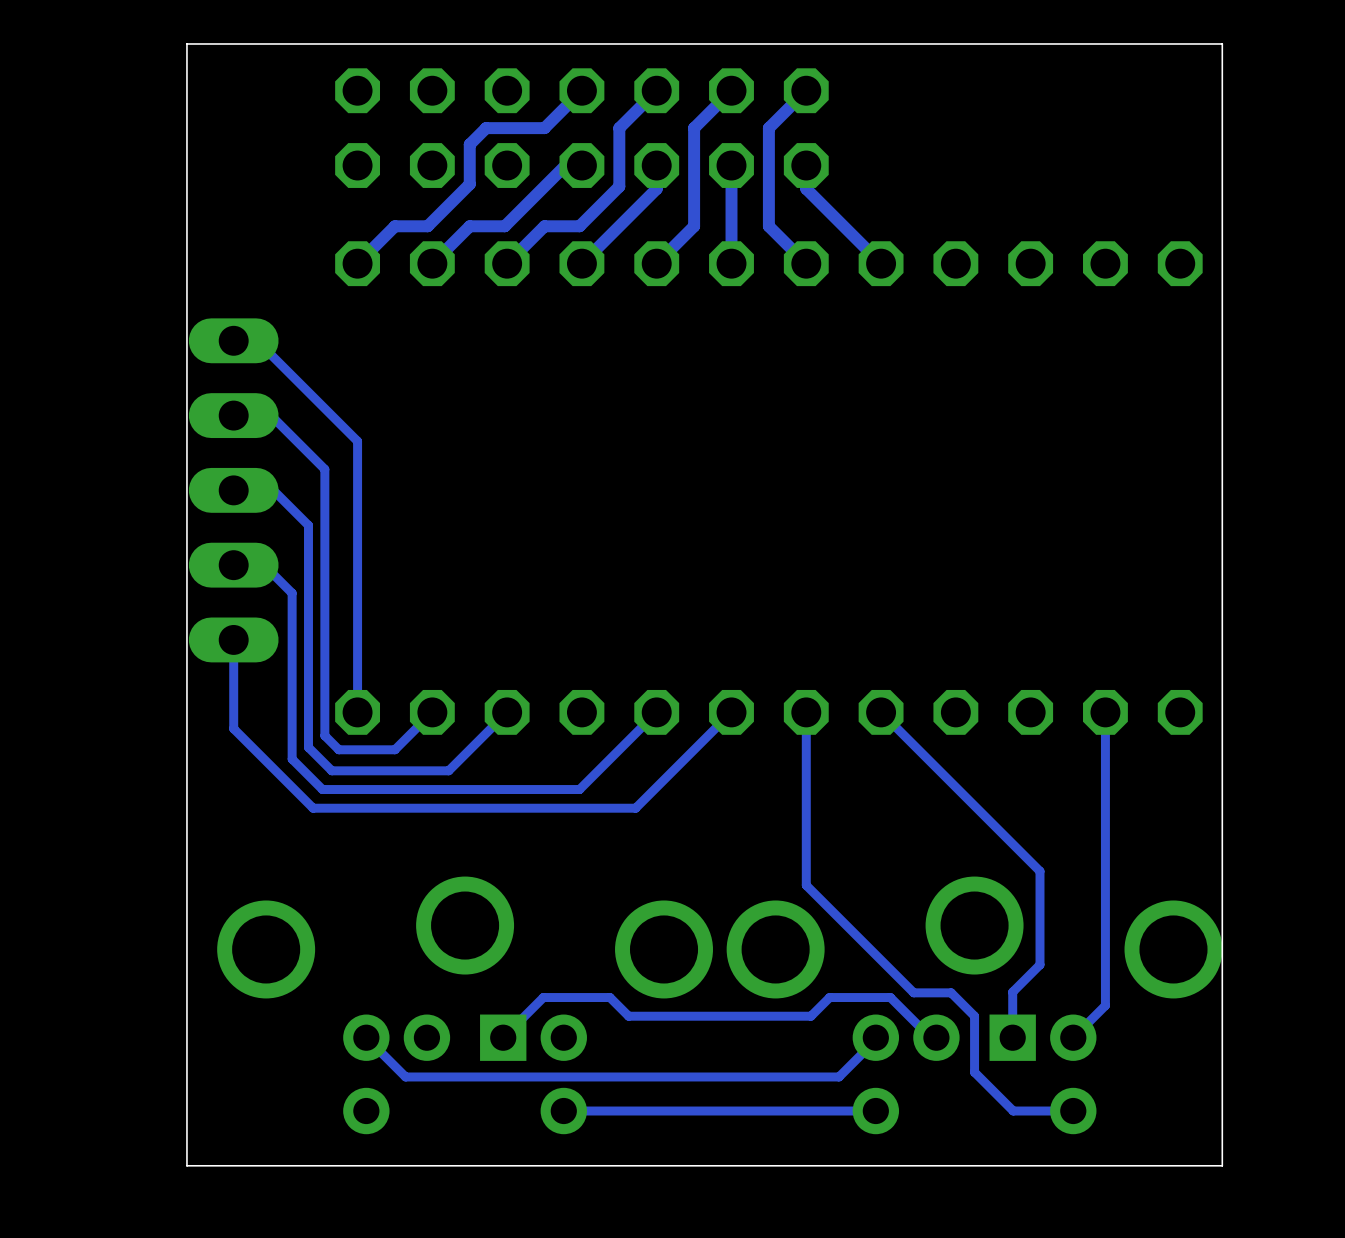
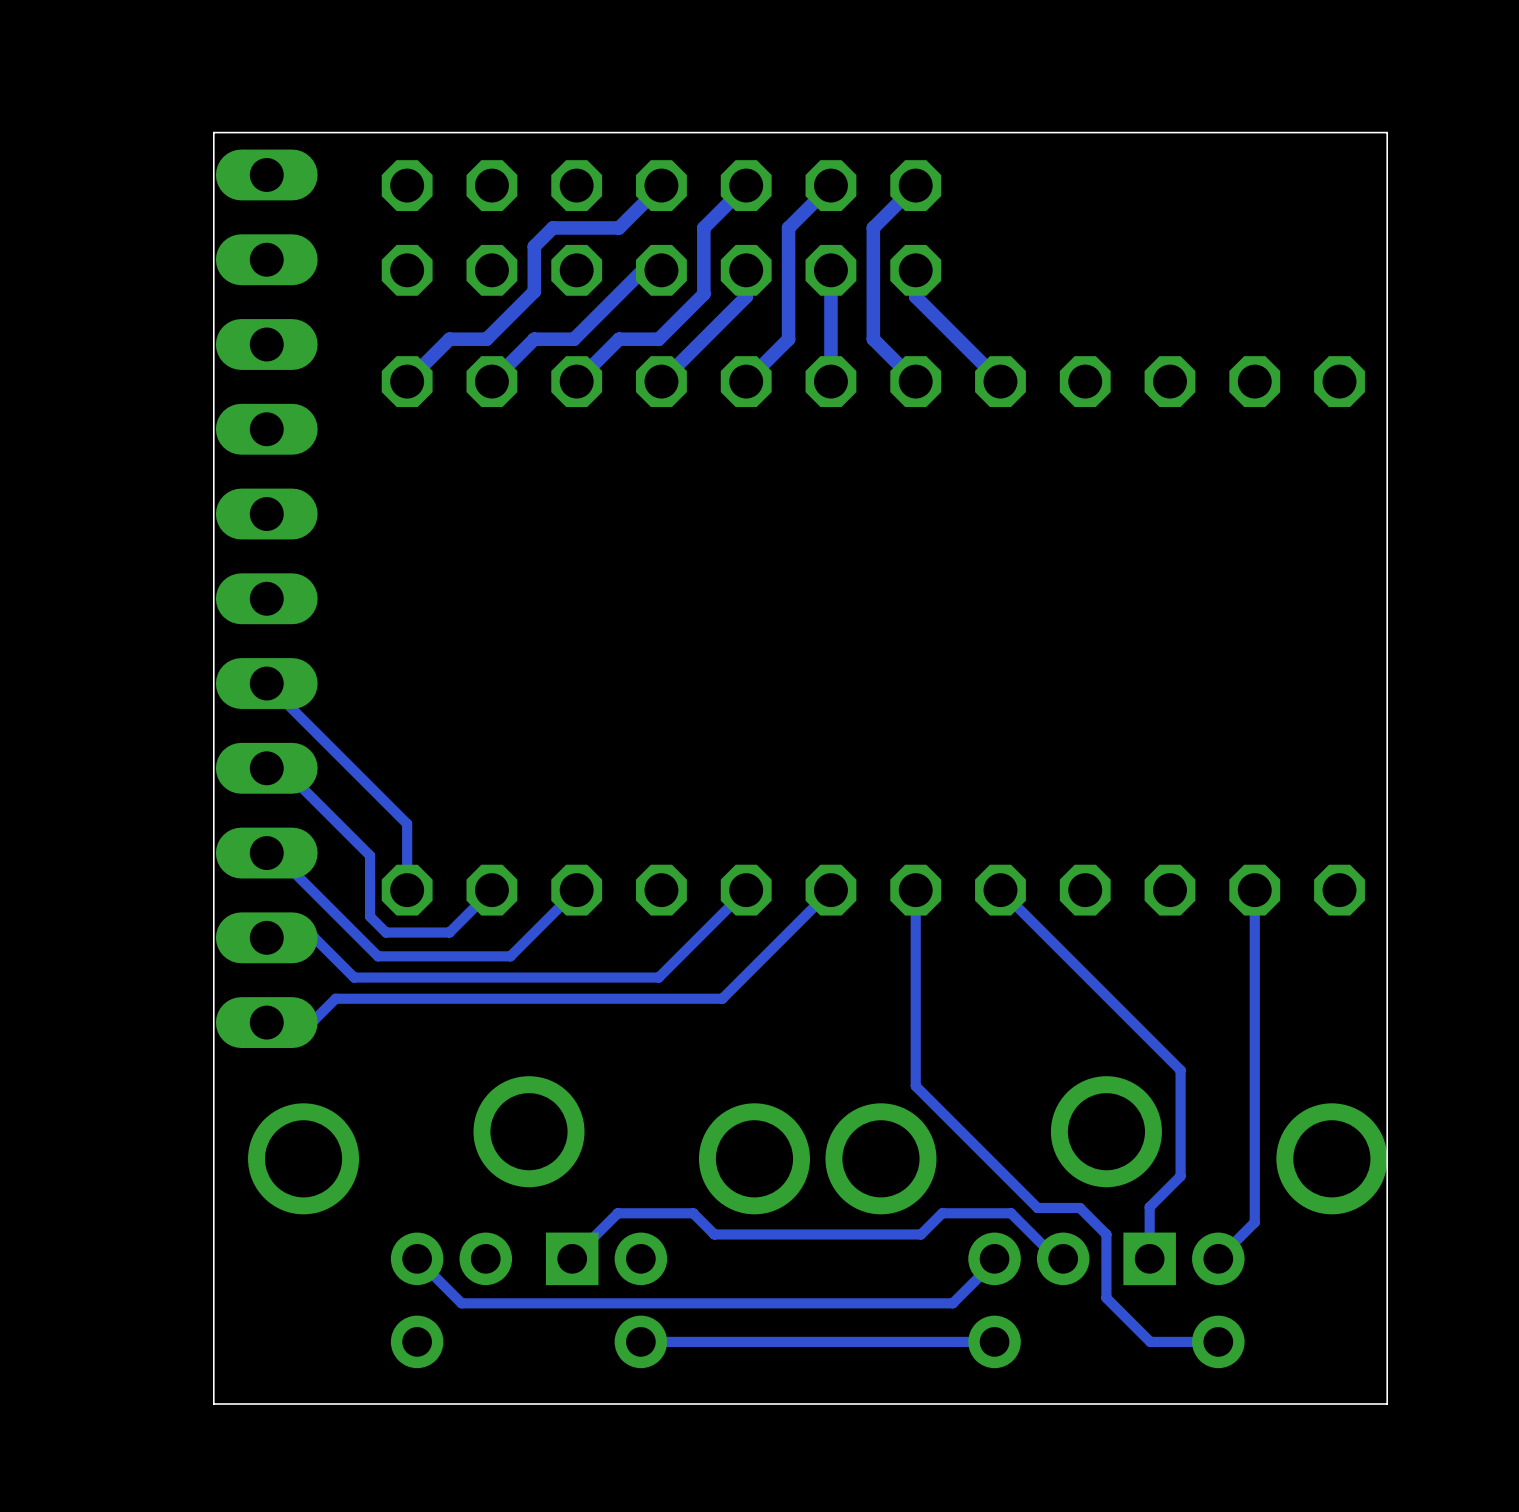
track: (233, 340) (257, 340) (357, 441) (357, 653) -> (266, 683) (407, 823)
track: (233, 415) (271, 415) (324, 469) (324, 682) -> (266, 768) (282, 768) (370, 855)
part: none -> (266, 598)
track: (233, 490) (273, 490) (308, 525) (308, 747) -> (266, 853) (274, 853) (351, 929)
part: (233, 490) -> none
track: (233, 565) (264, 565) (292, 593) (292, 759) (322, 789) -> (266, 937) (314, 937) (354, 977) (367, 977)
track: (233, 639) (233, 728) (313, 808) -> (266, 1022) (269, 1019) (314, 1019) (335, 998) (356, 998)

